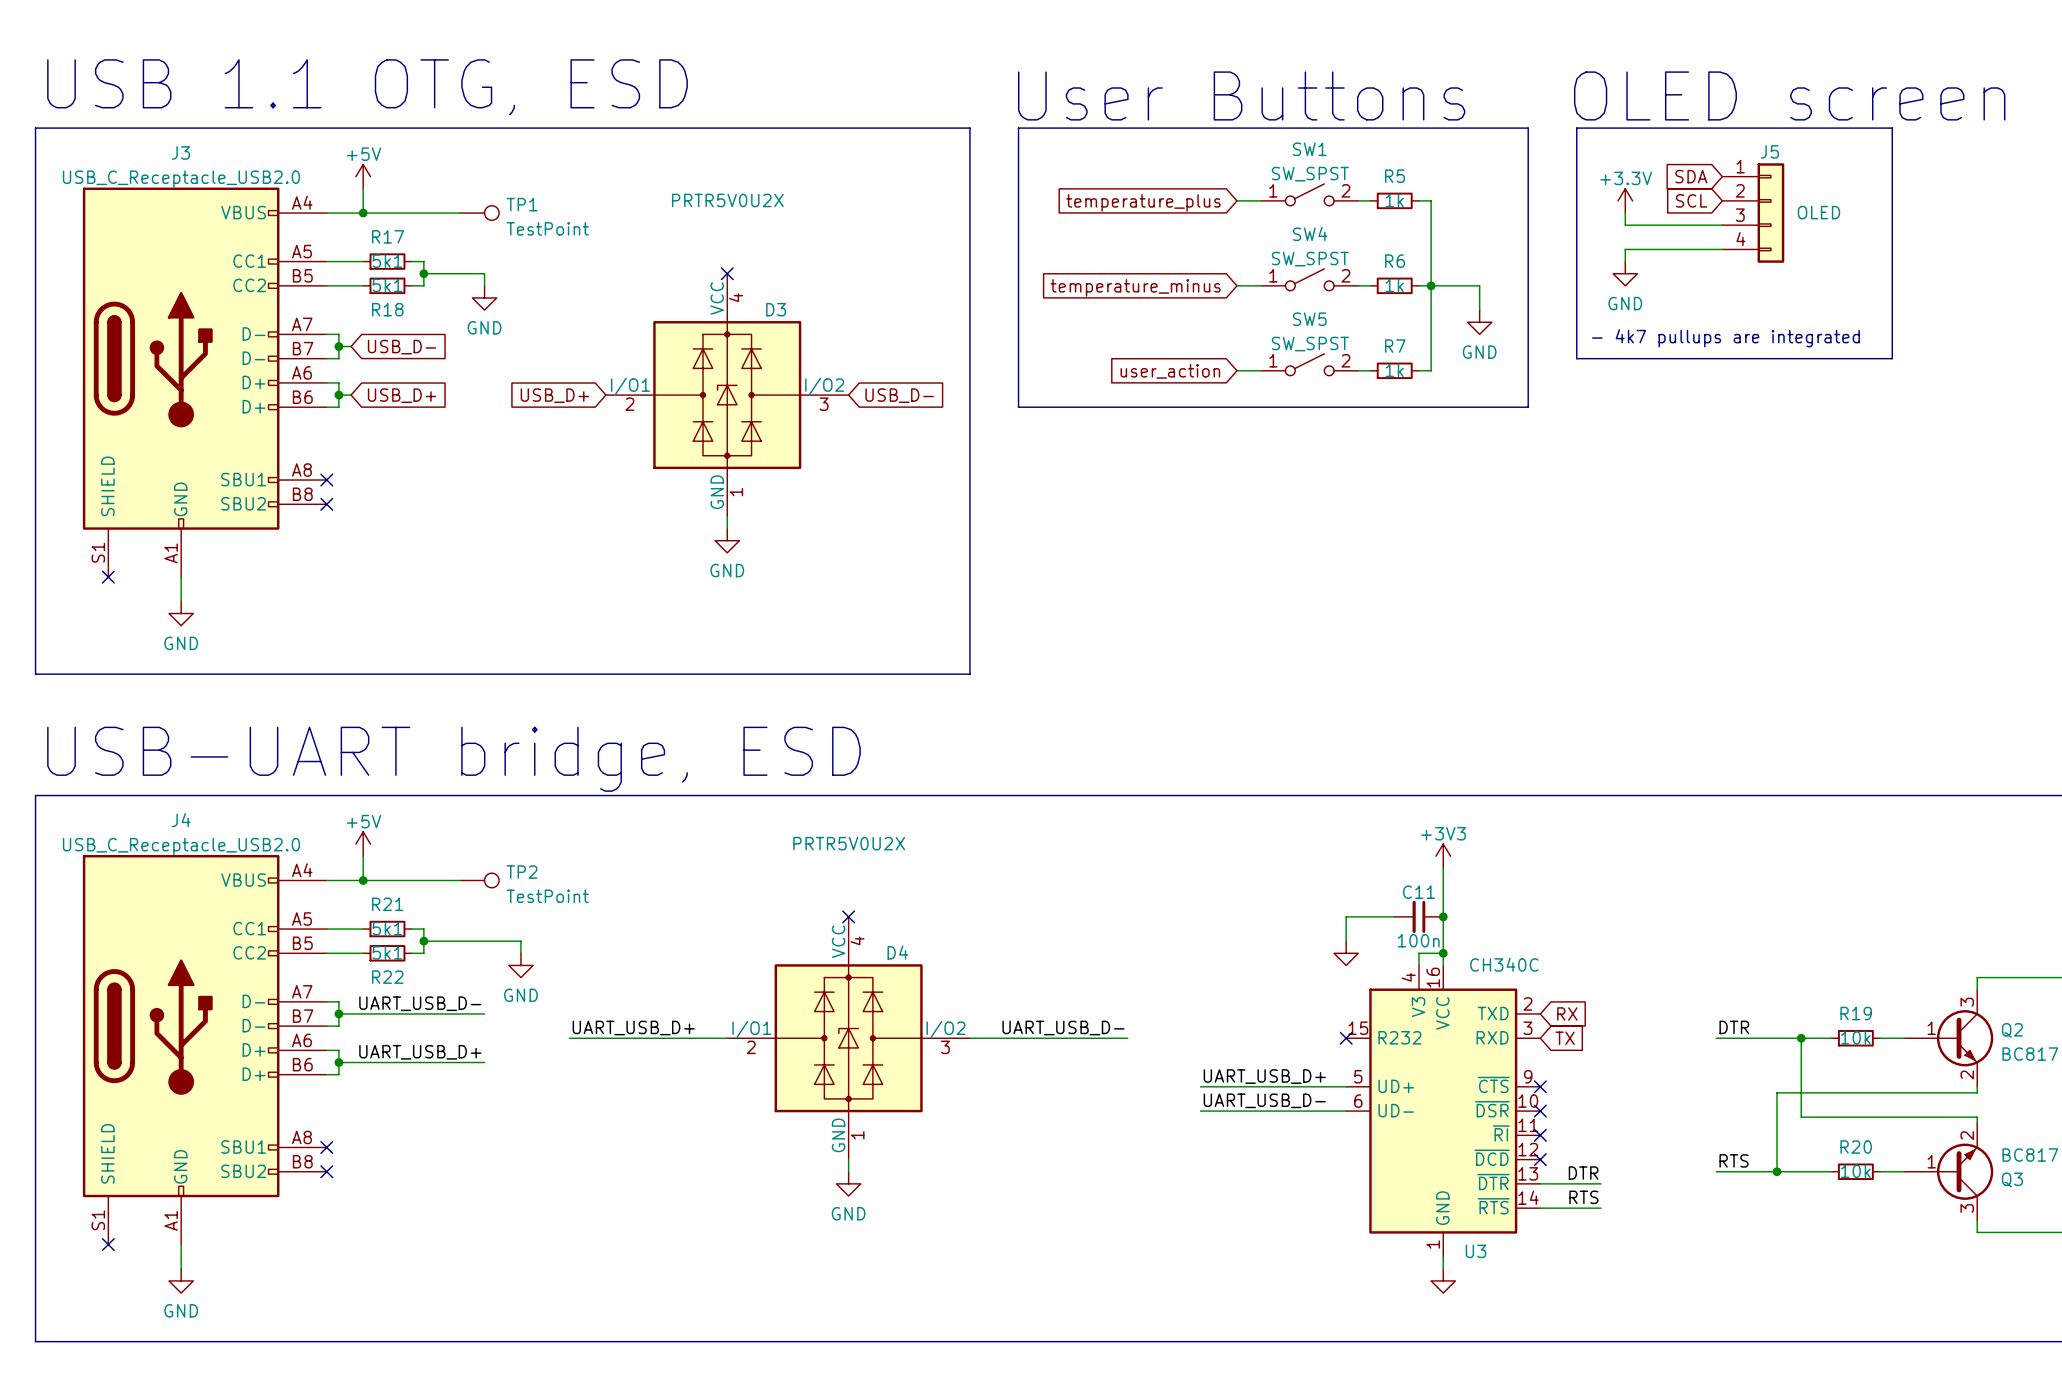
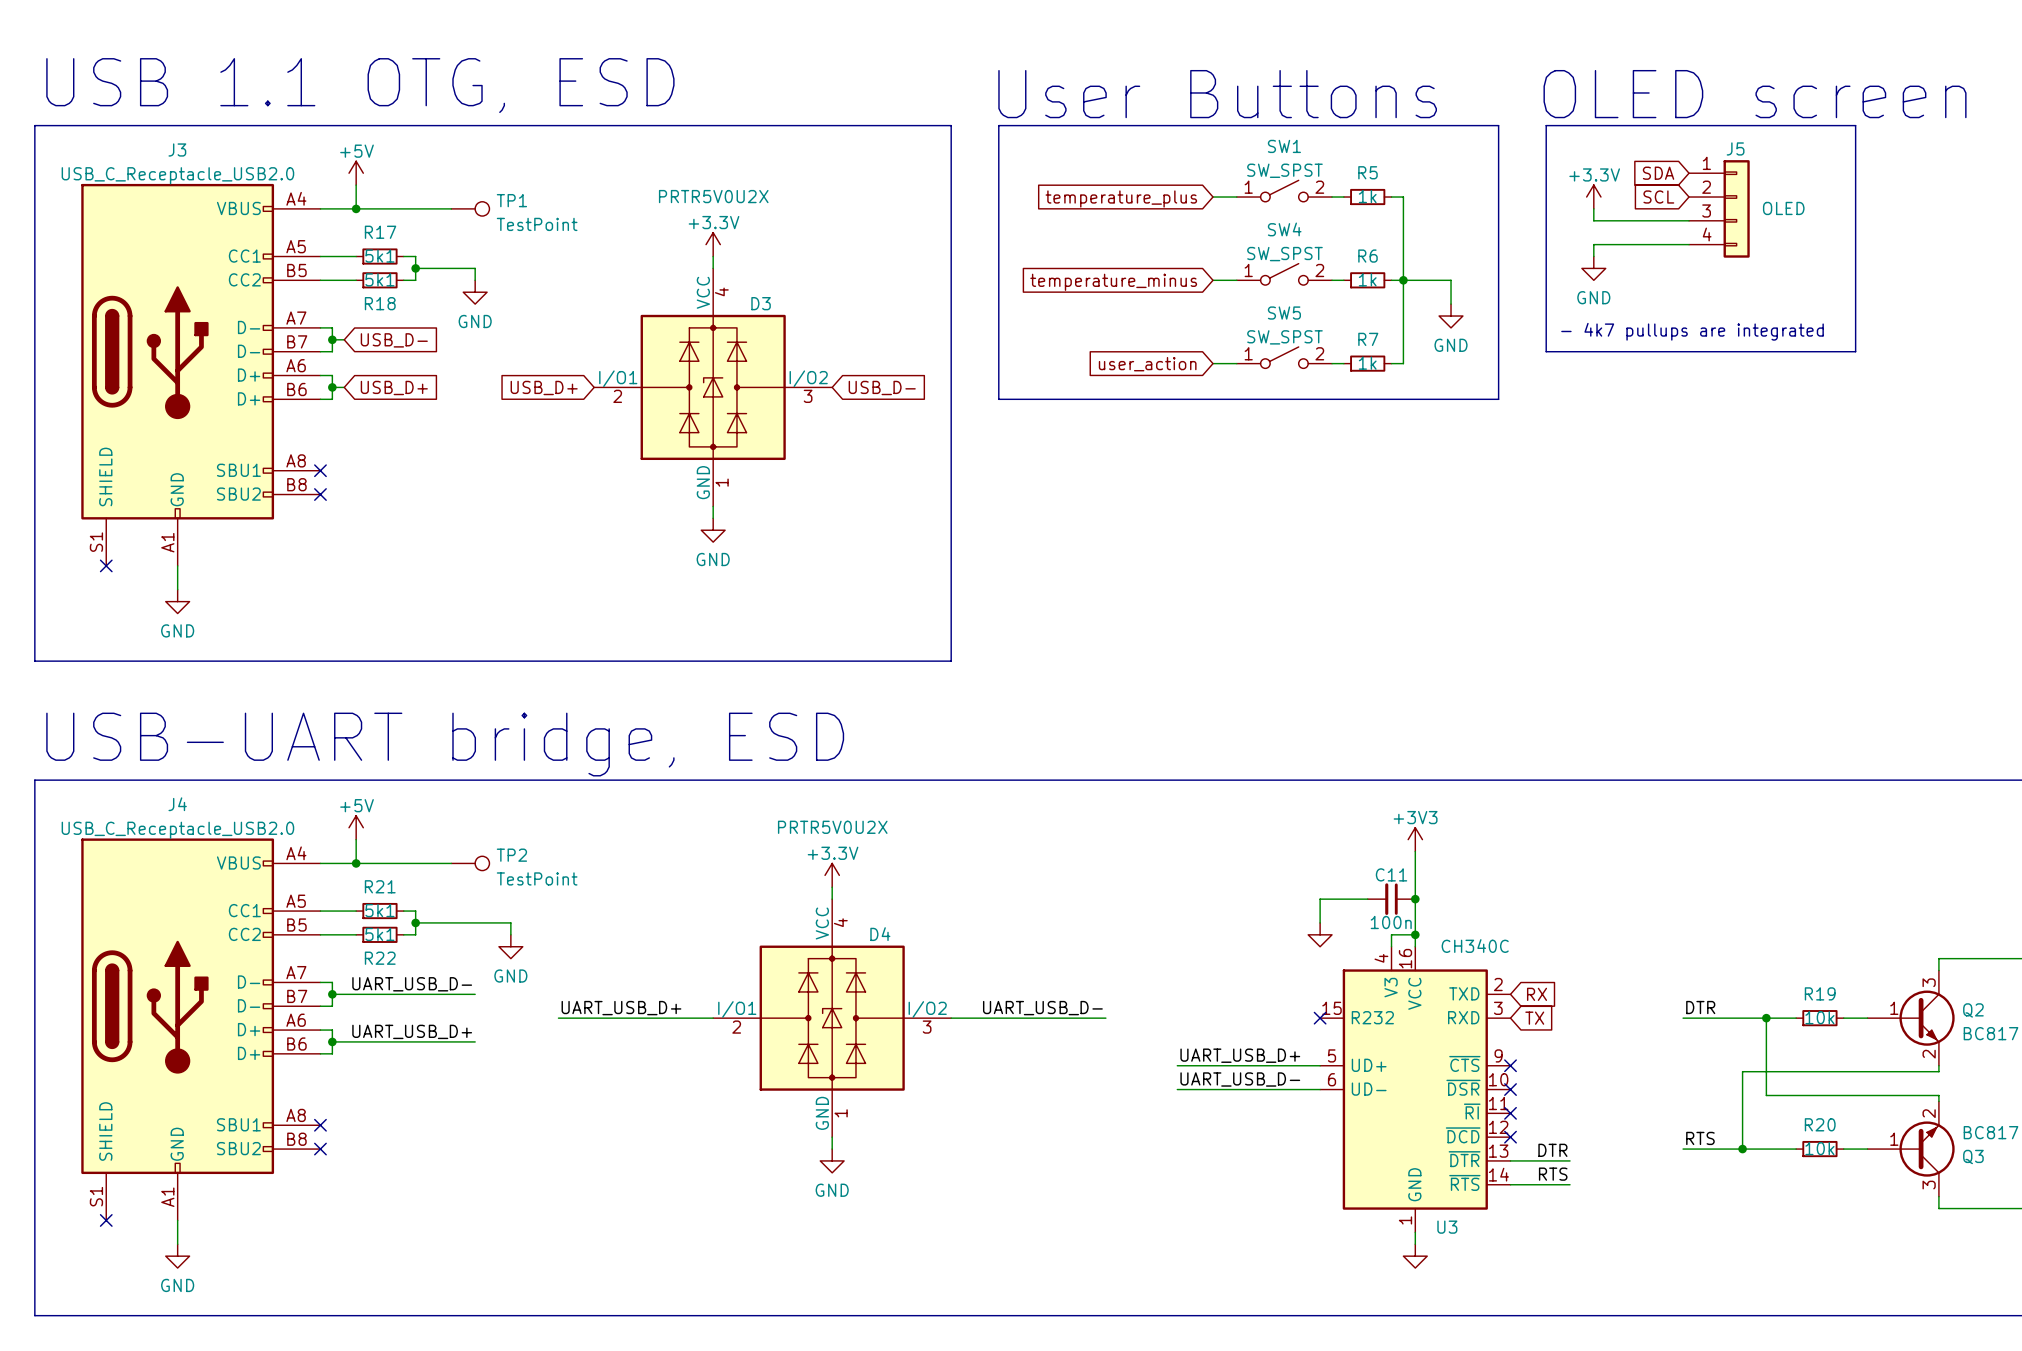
power symbol: none -> +3.3V (713, 244)
wire: none -> (713, 256) (713, 268)
no-connect mark: (727, 273) -> none
power symbol: none -> +3.3V (832, 875)
wire: none -> (832, 887) (832, 899)
no-connect mark: (848, 916) -> none

